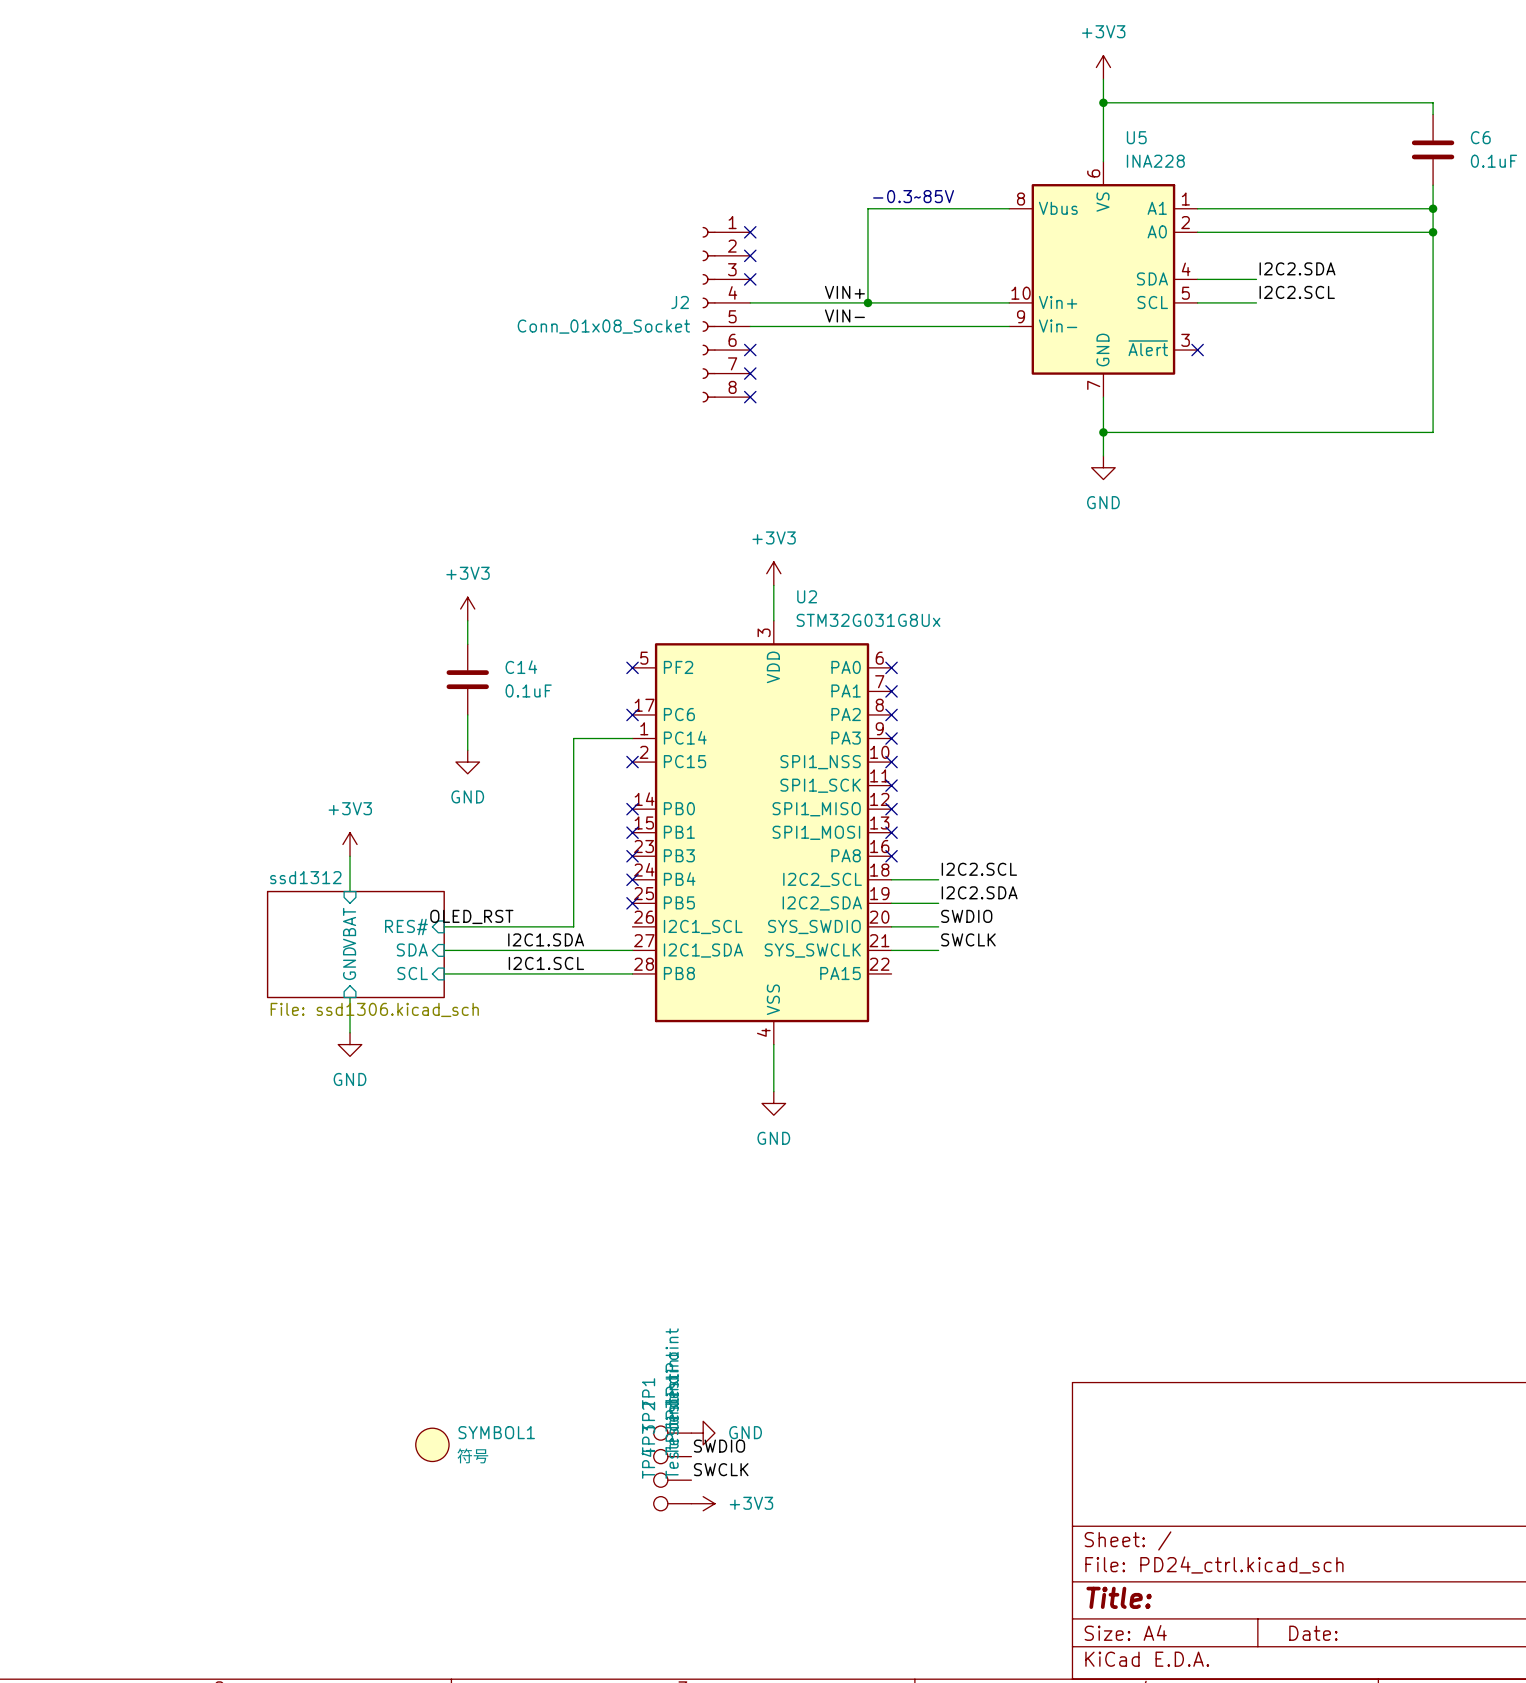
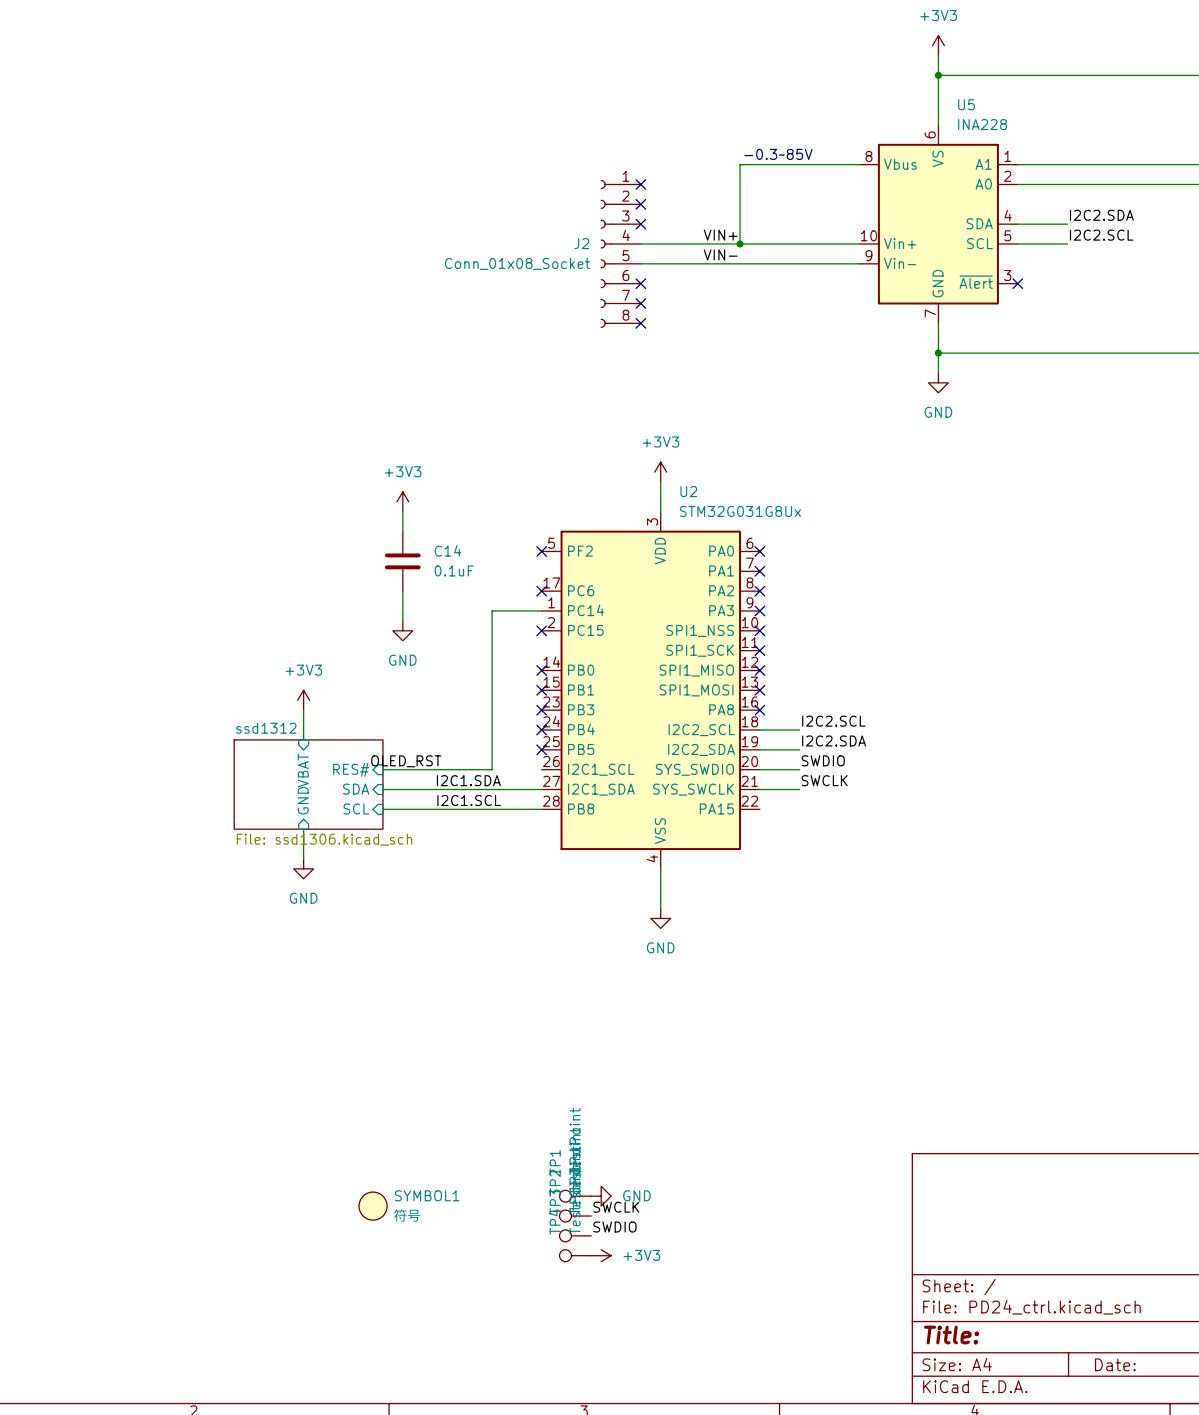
label: SWDIO (719, 1446) -> SWCLK (616, 1207)
label: SWCLK (721, 1469) -> SWDIO (614, 1227)

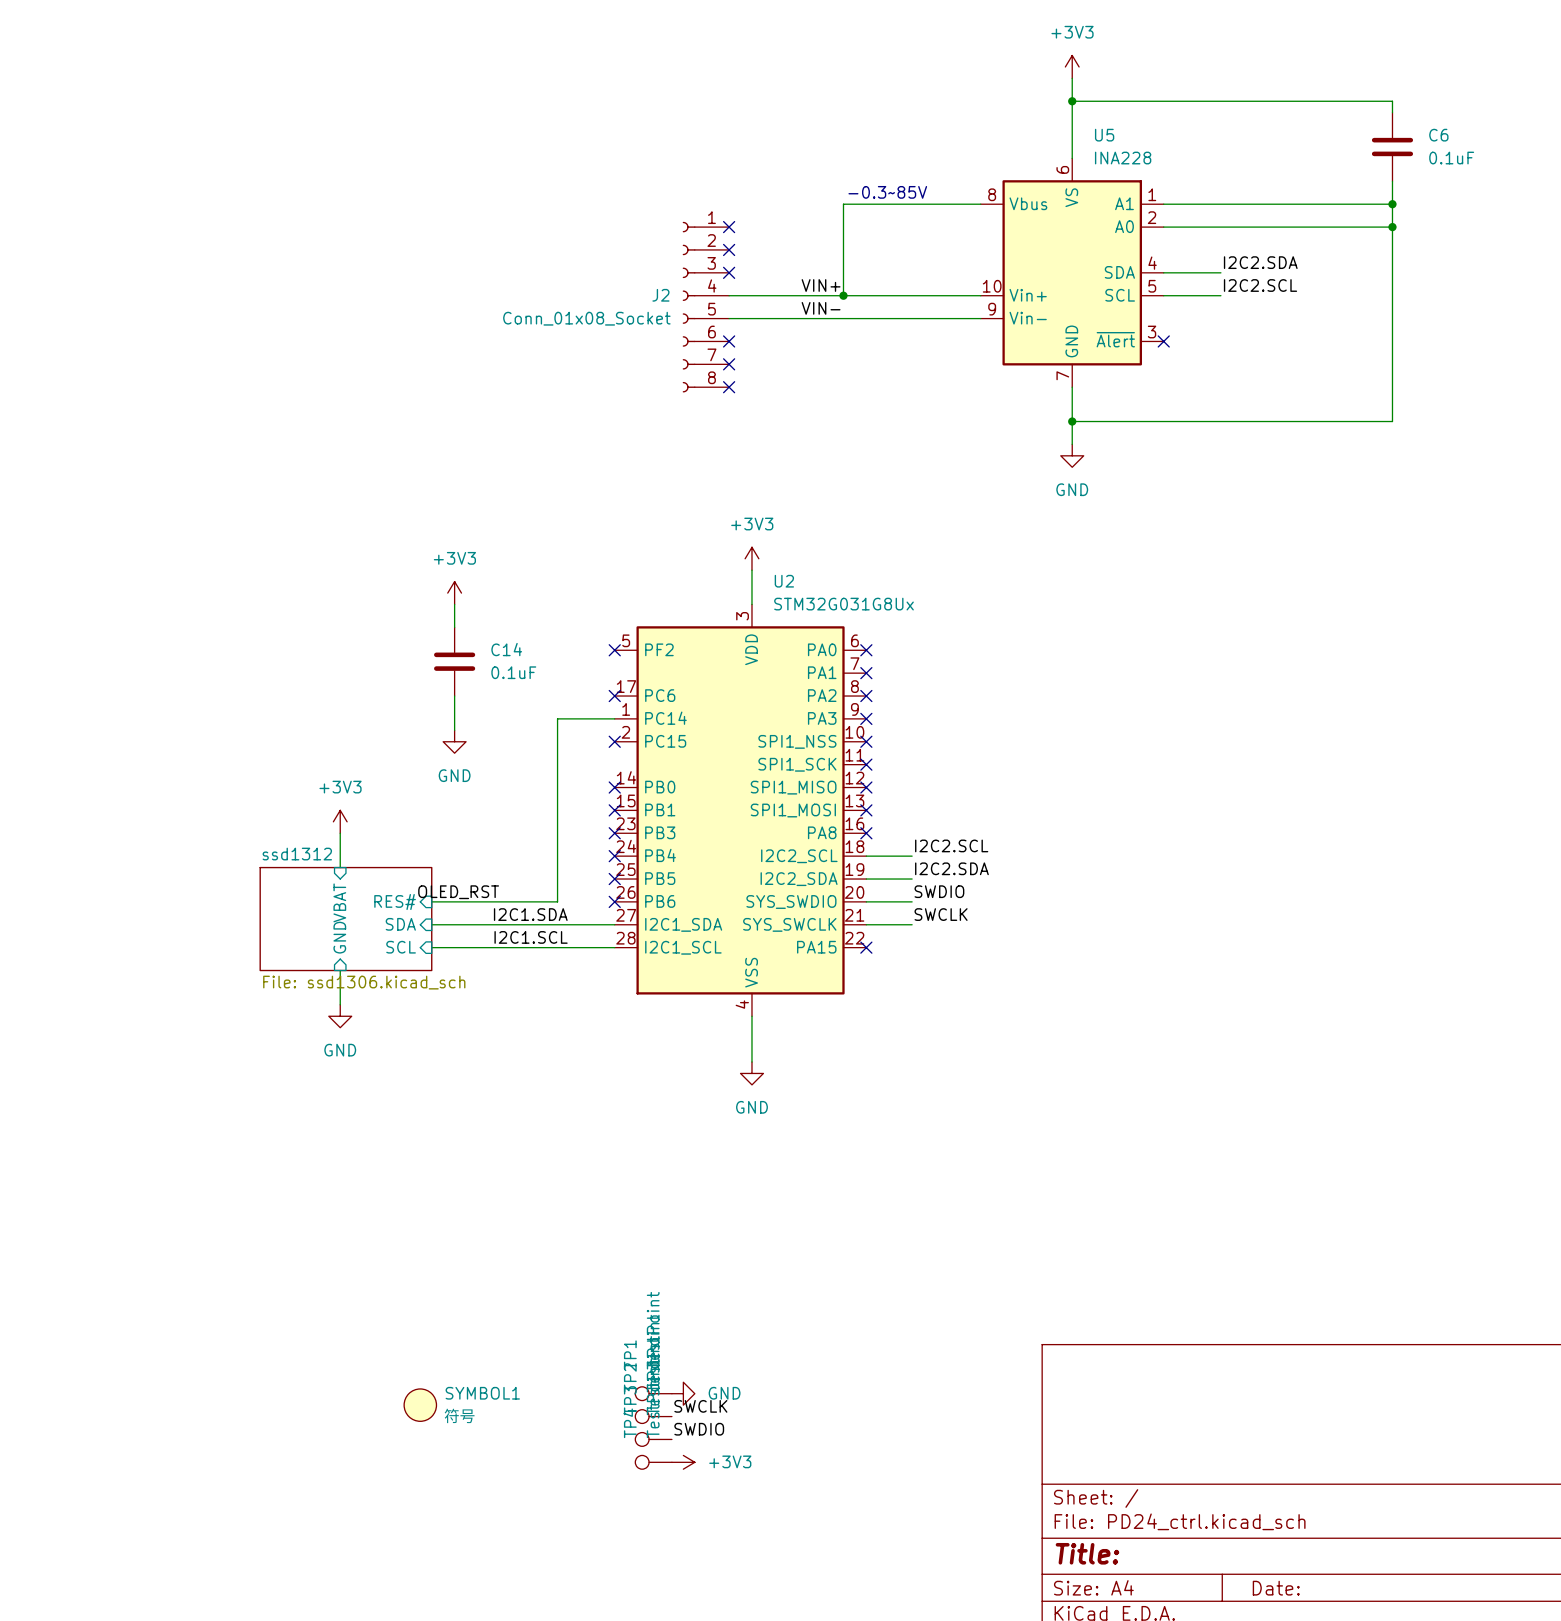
no-connect mark: none -> (614, 901)
U2 pin name: I2C1_SCL (601, 769) -> PB6 (660, 901)
U2 pin name: PB8 (581, 808) -> I2C1_SCL (683, 947)
no-connect mark: none -> (866, 947)

